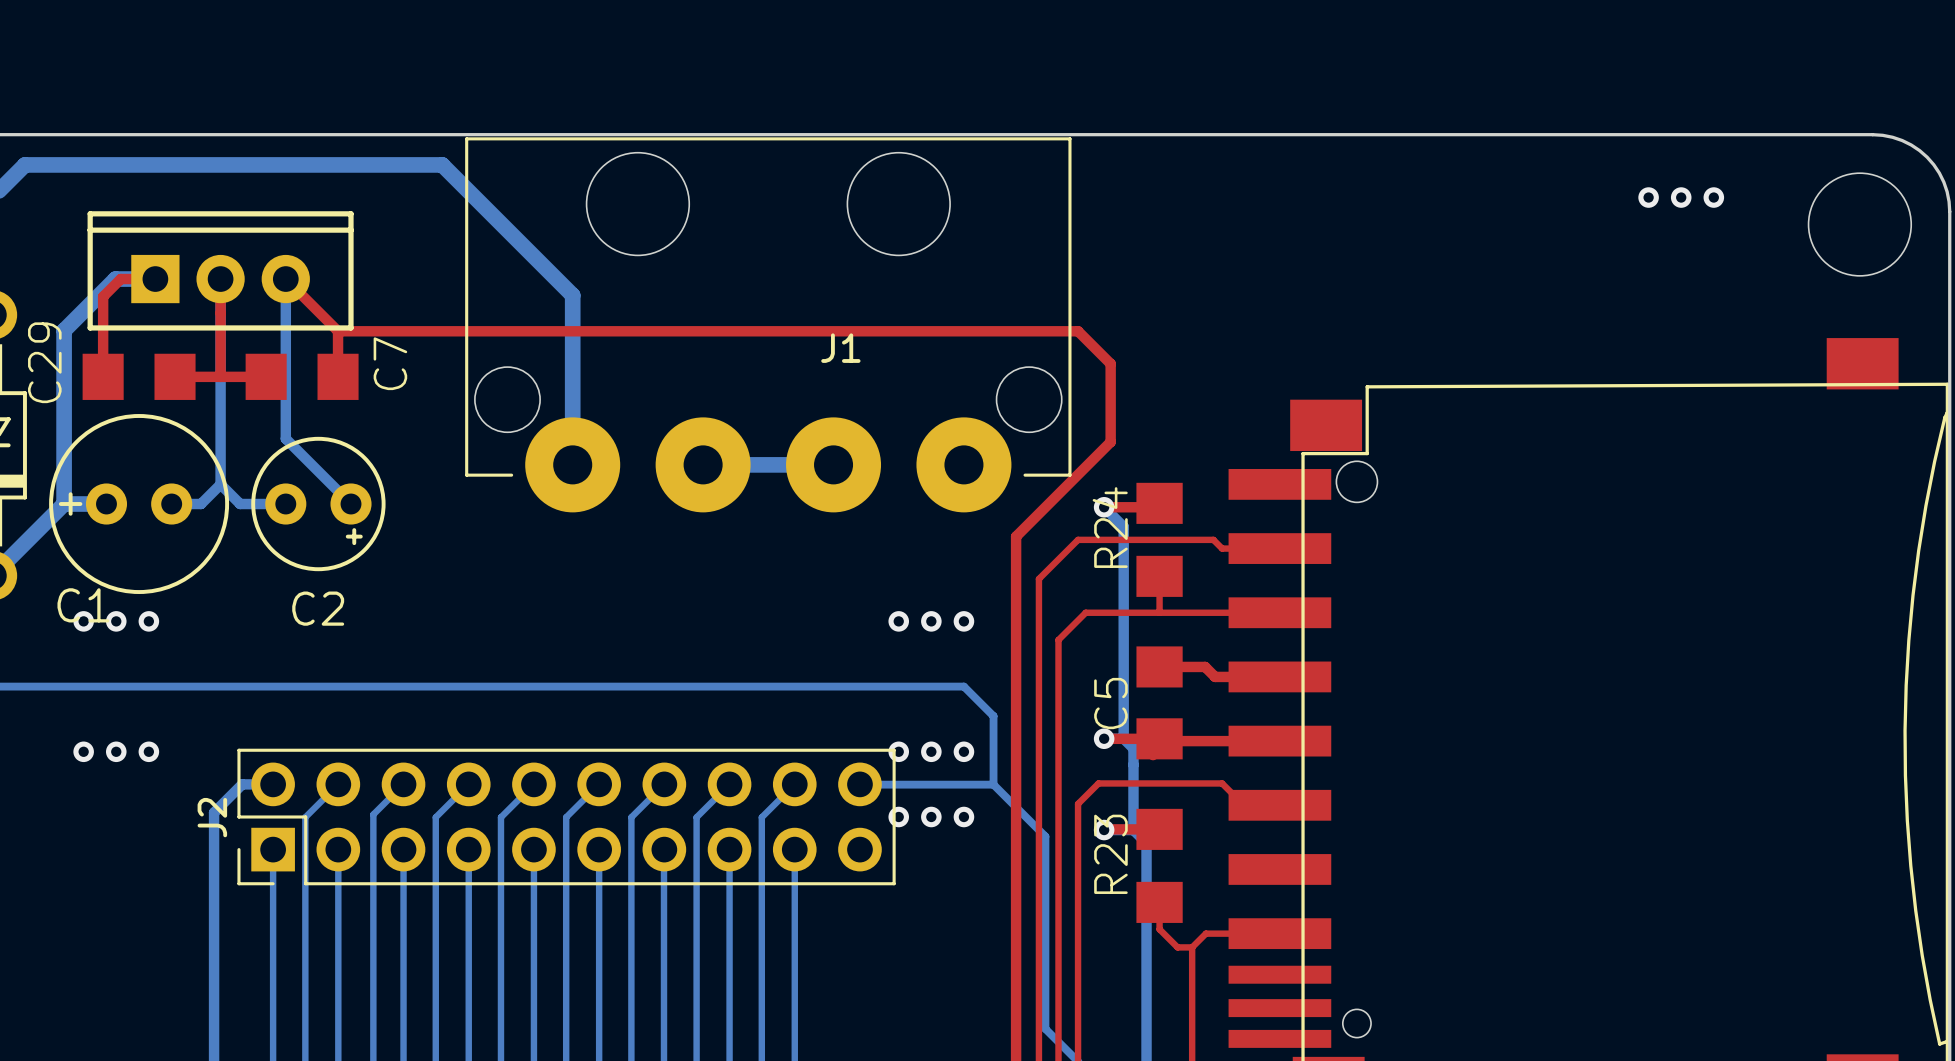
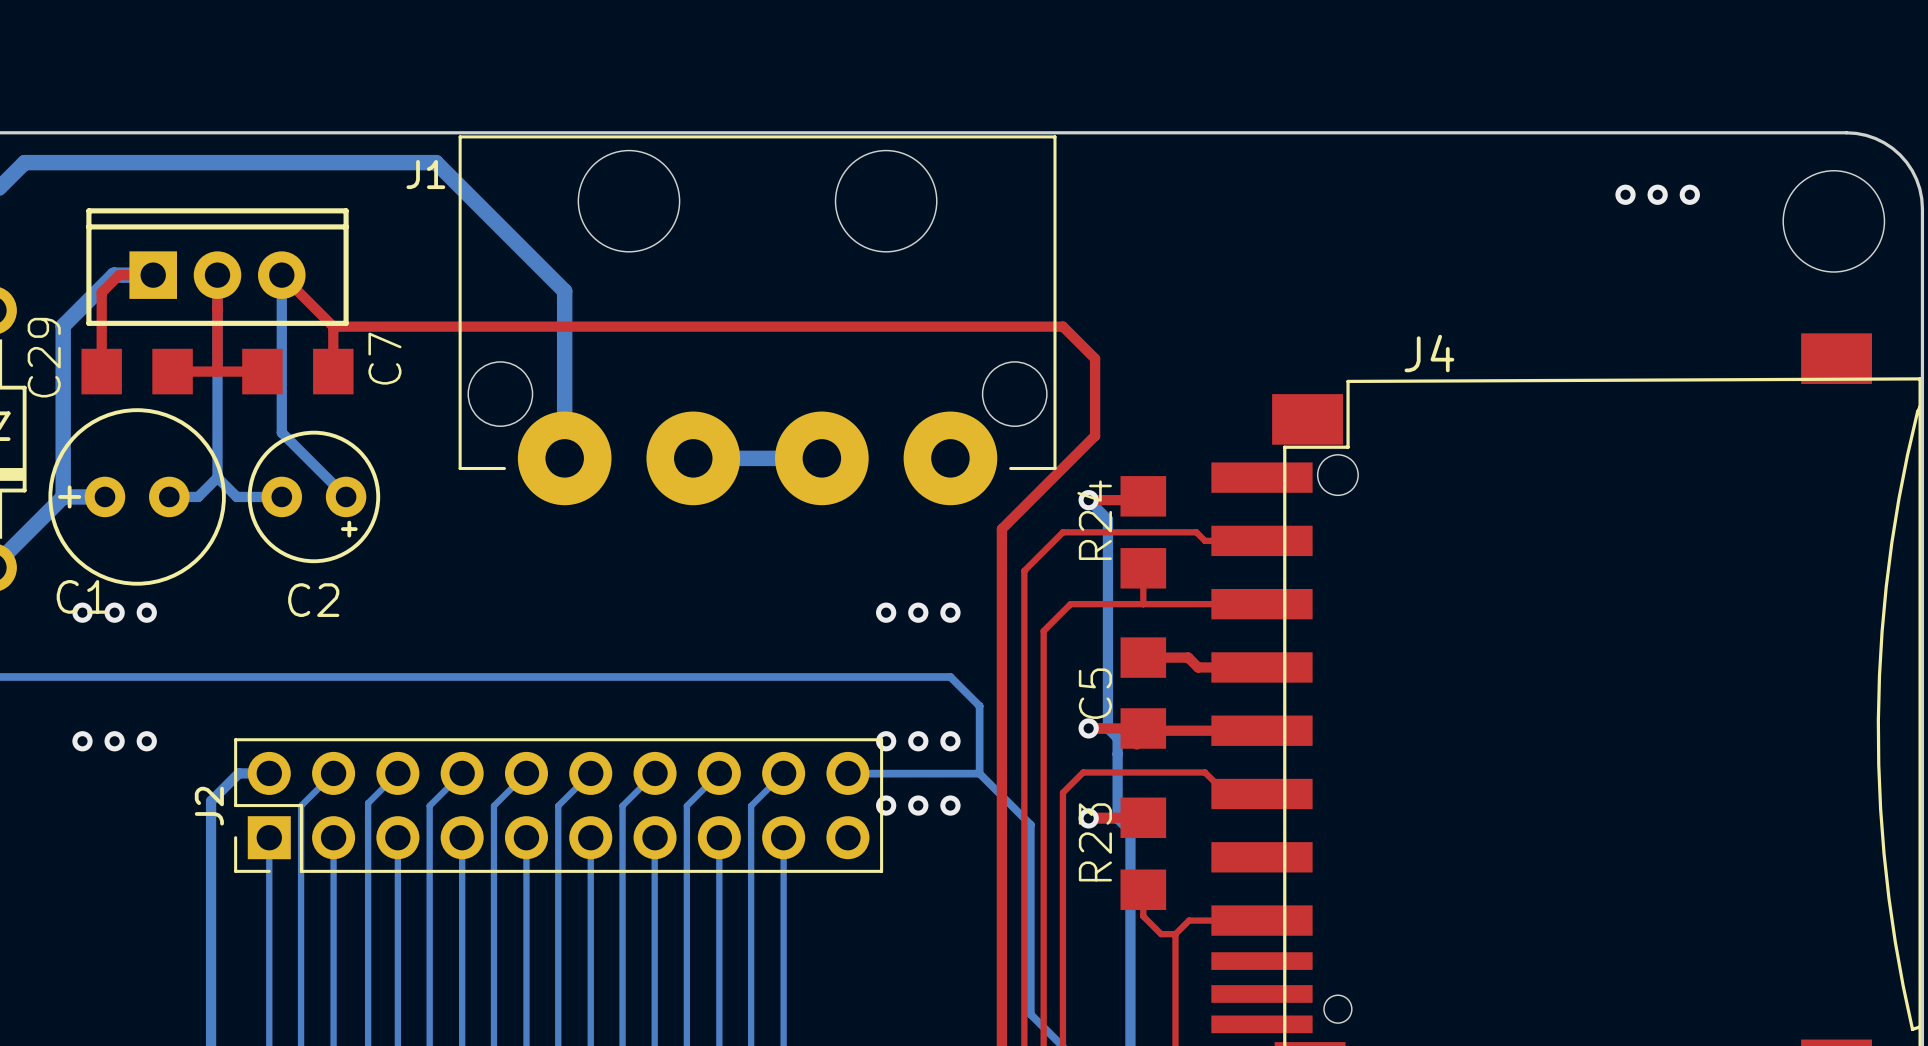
J1 name position: J1 (840, 348) -> J1 (425, 174)
J4 name: none -> J4 (1429, 353)

